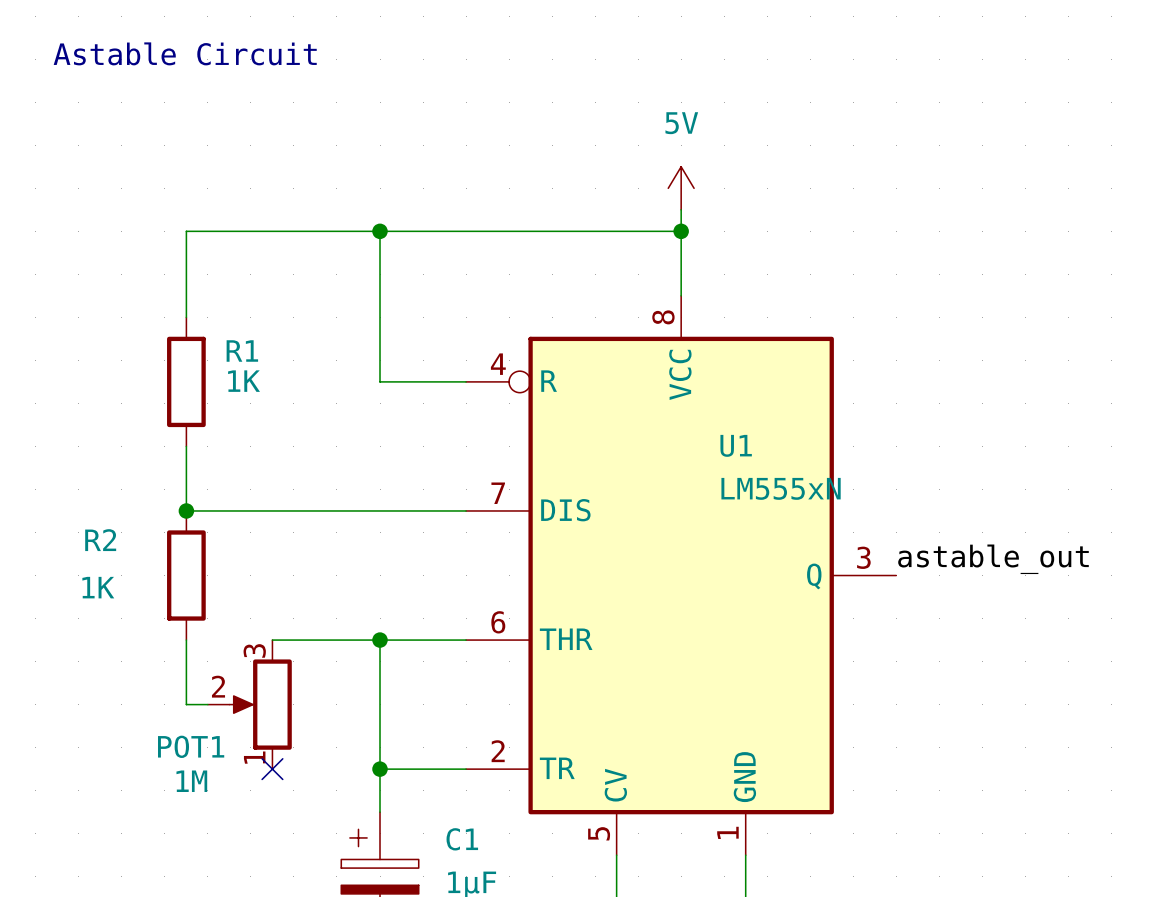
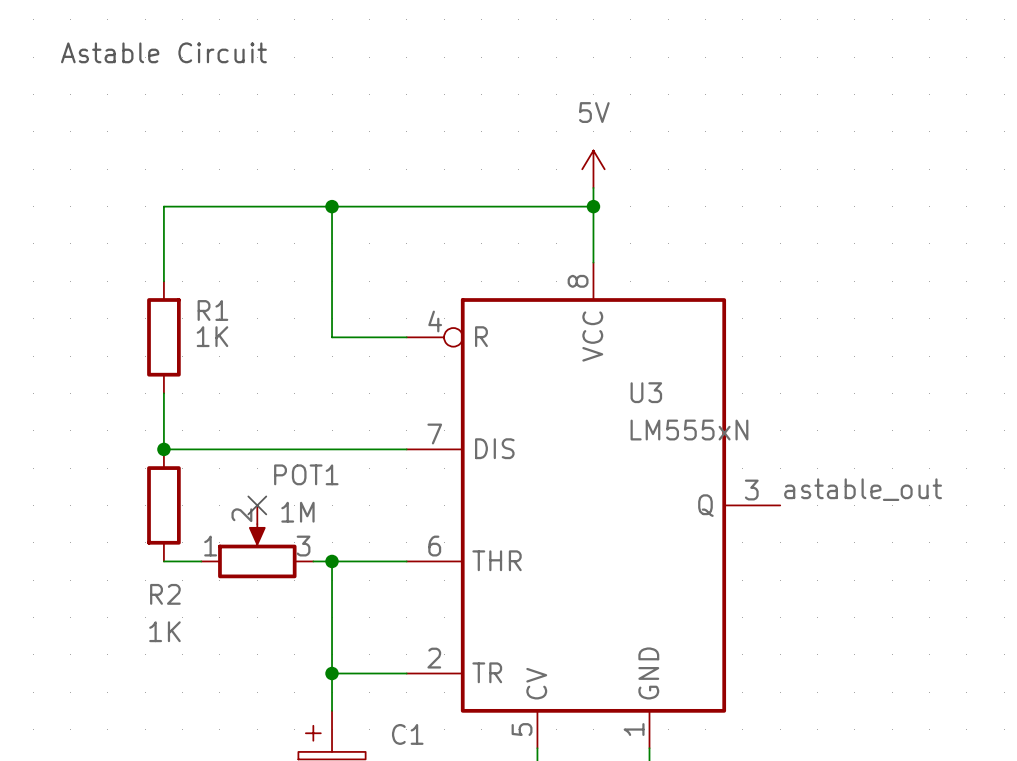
U1 name: U1 (736, 445) -> U3 (646, 392)
R2 name position: R2 (100, 540) -> R2 (165, 594)
no-connect mark: none -> (257, 505)
R2 value position: 1K (98, 587) -> 1K (164, 631)
wire: (186, 640) (186, 704) (207, 704) -> (163, 561) (201, 561)
wire: (272, 640) (358, 640) -> none
POT1 position: (249, 704) -> (257, 541)
POT1 rotation: 0° (260, 704) -> 90° clockwise (257, 551)
POT1 name position: POT1 (191, 746) -> POT1 (306, 474)
no-connect mark: (272, 769) -> none
POT1 value position: 1M (191, 781) -> 1M (297, 512)

